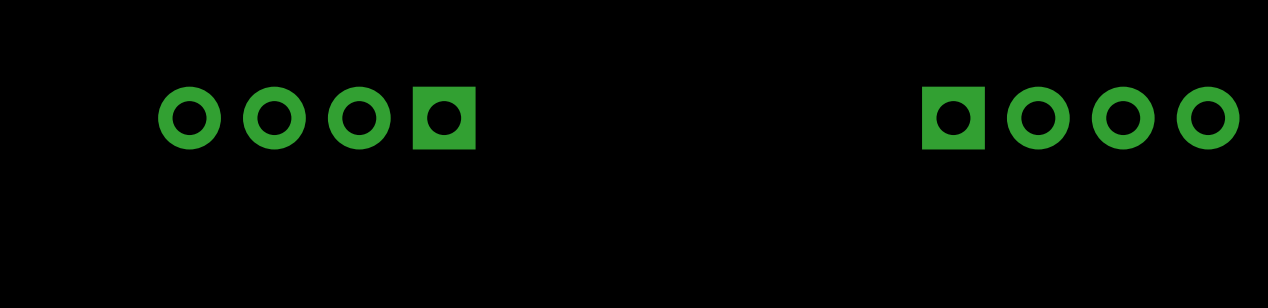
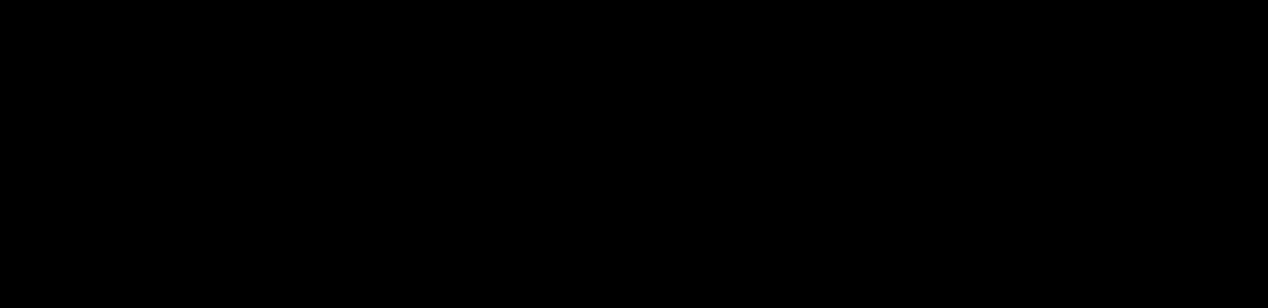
part: (316, 118) -> none
part: (1080, 118) -> none

